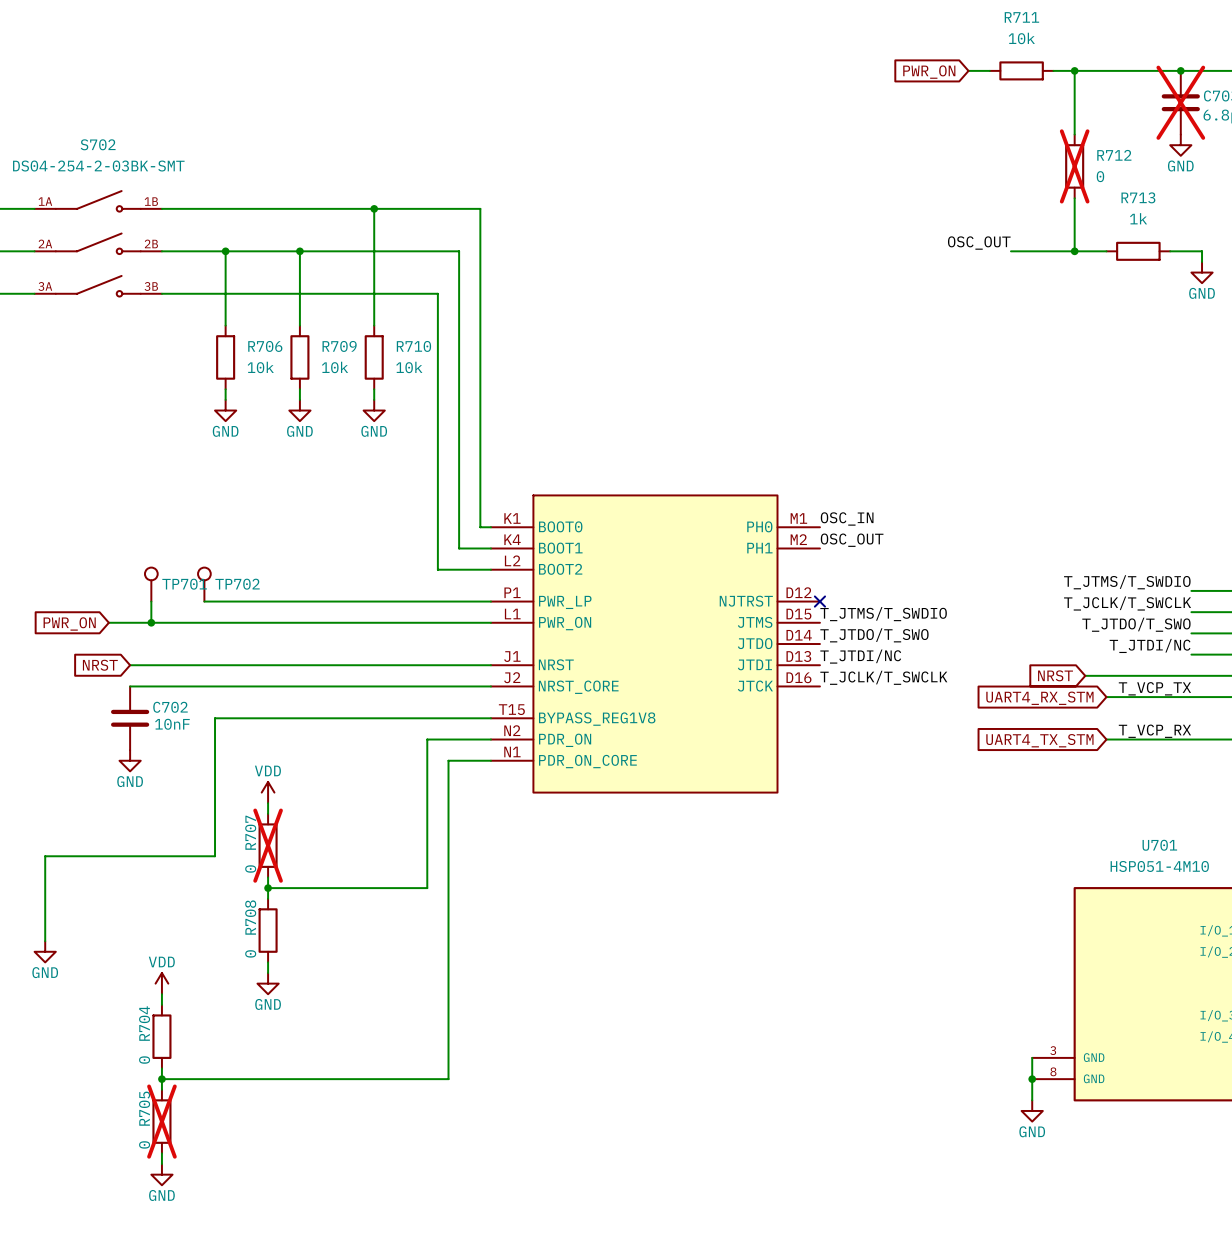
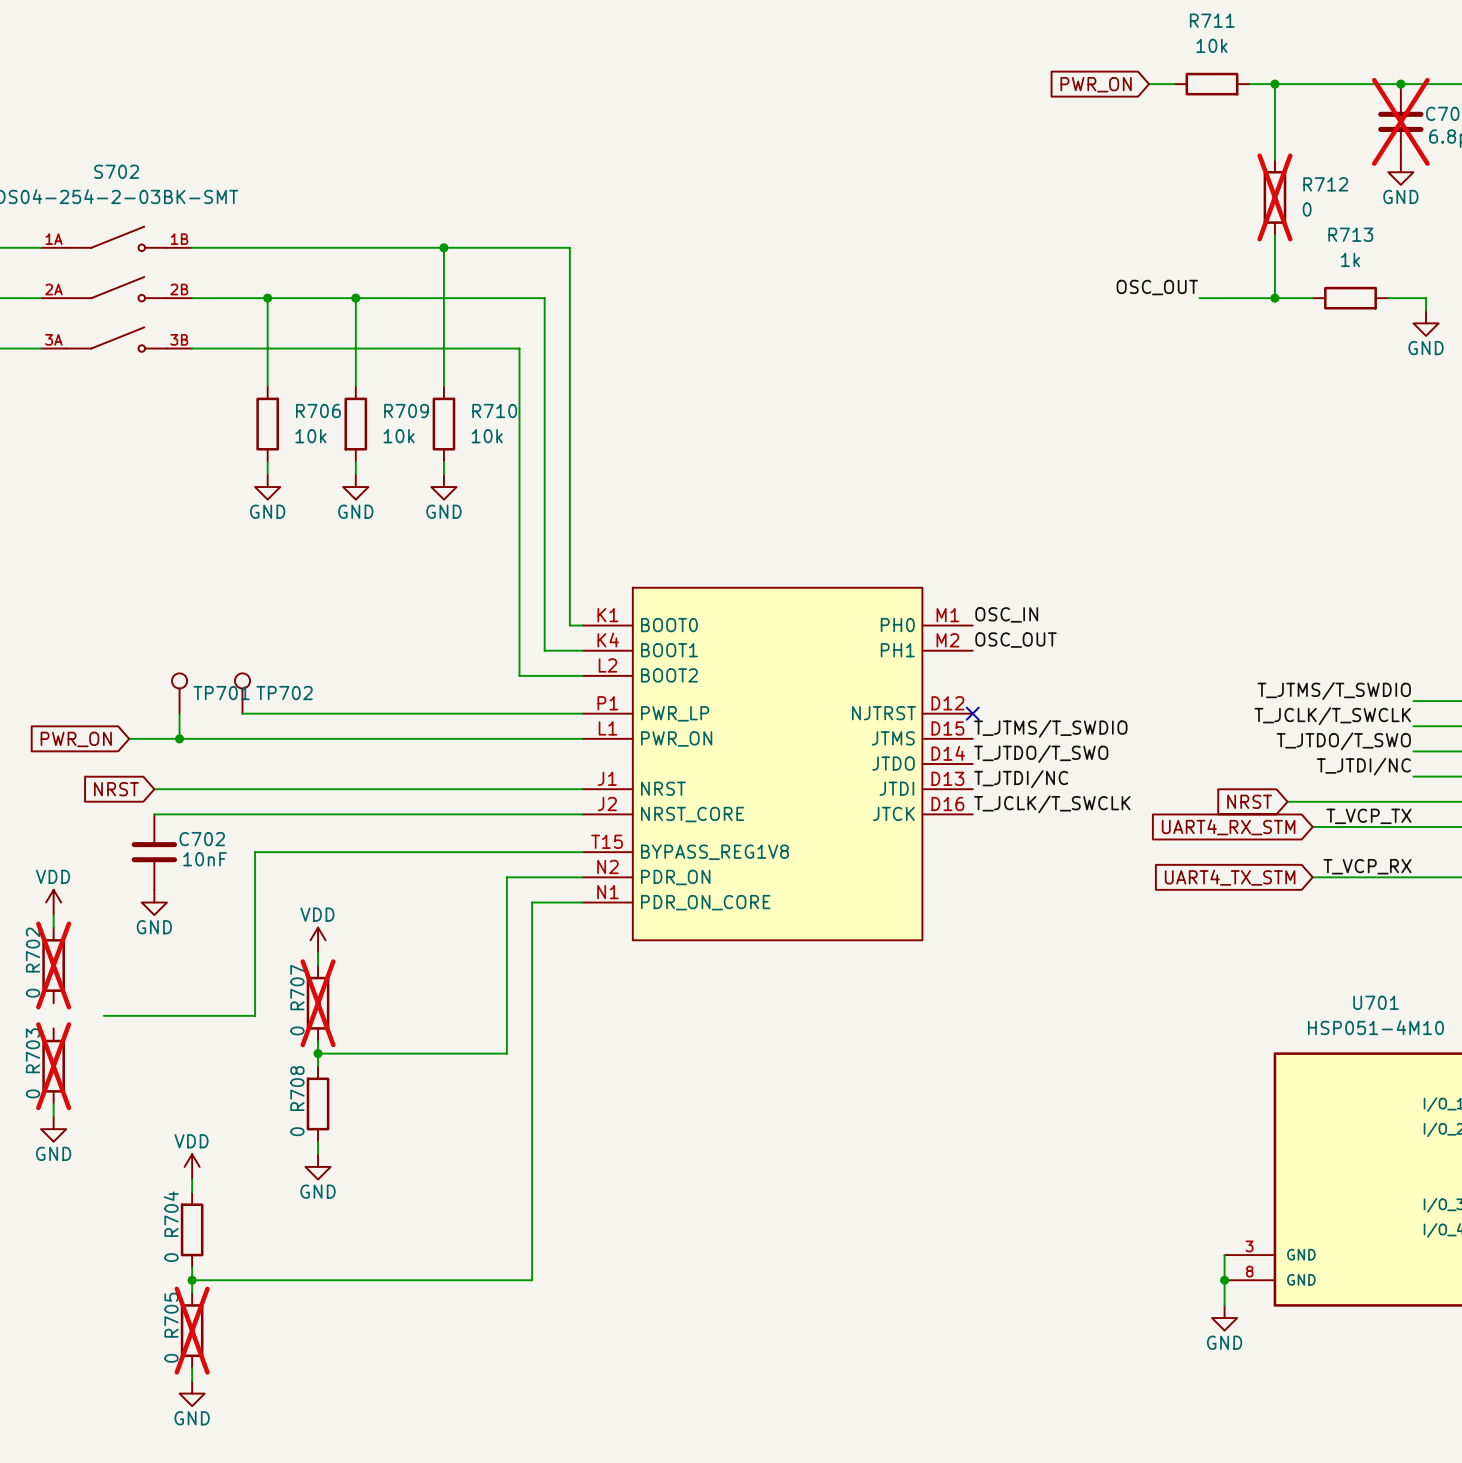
power symbol: none -> VDD (53, 902)
wire: none -> (53, 915) (53, 927)
R702: none -> 0 (53, 965)
wire: (87, 856) (45, 856) (45, 930) -> none
R703: none -> 0 (53, 1066)

